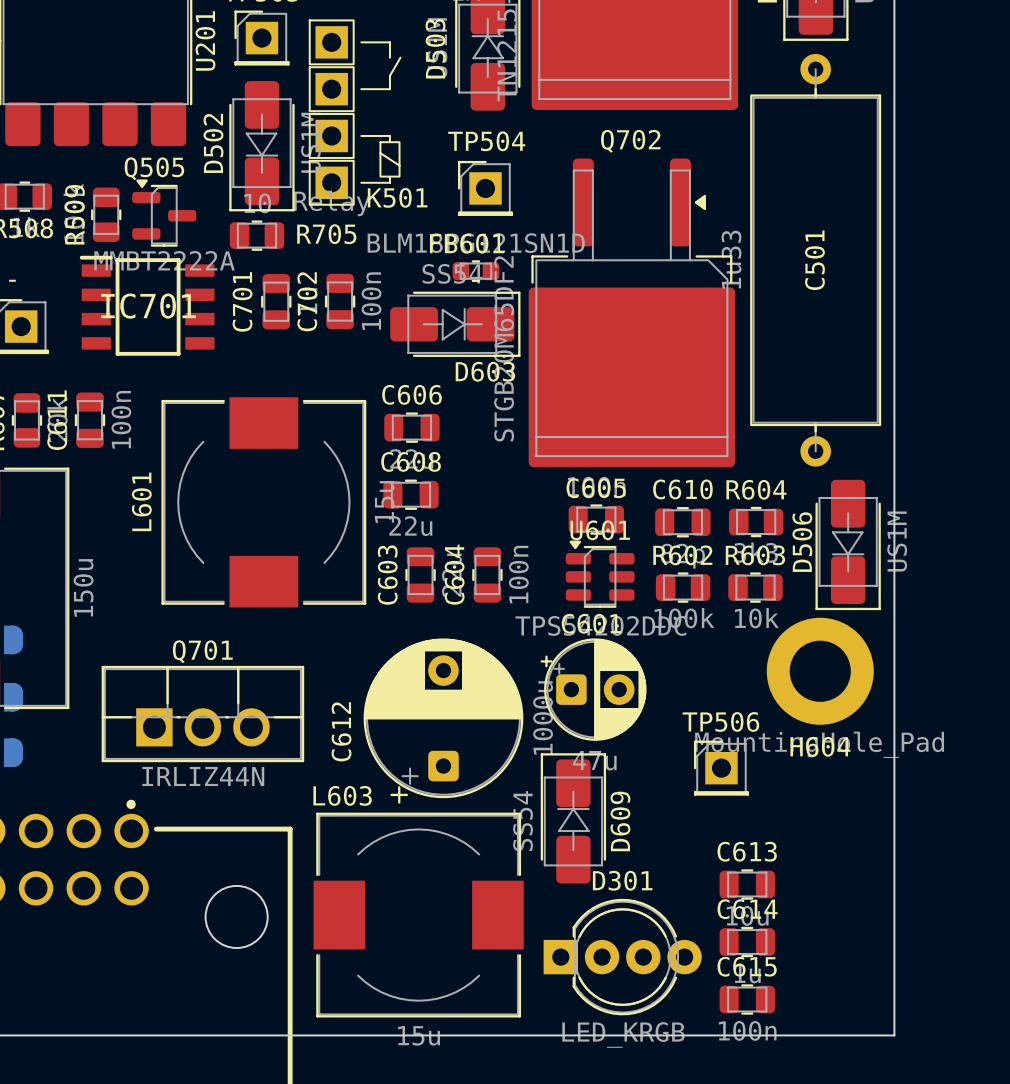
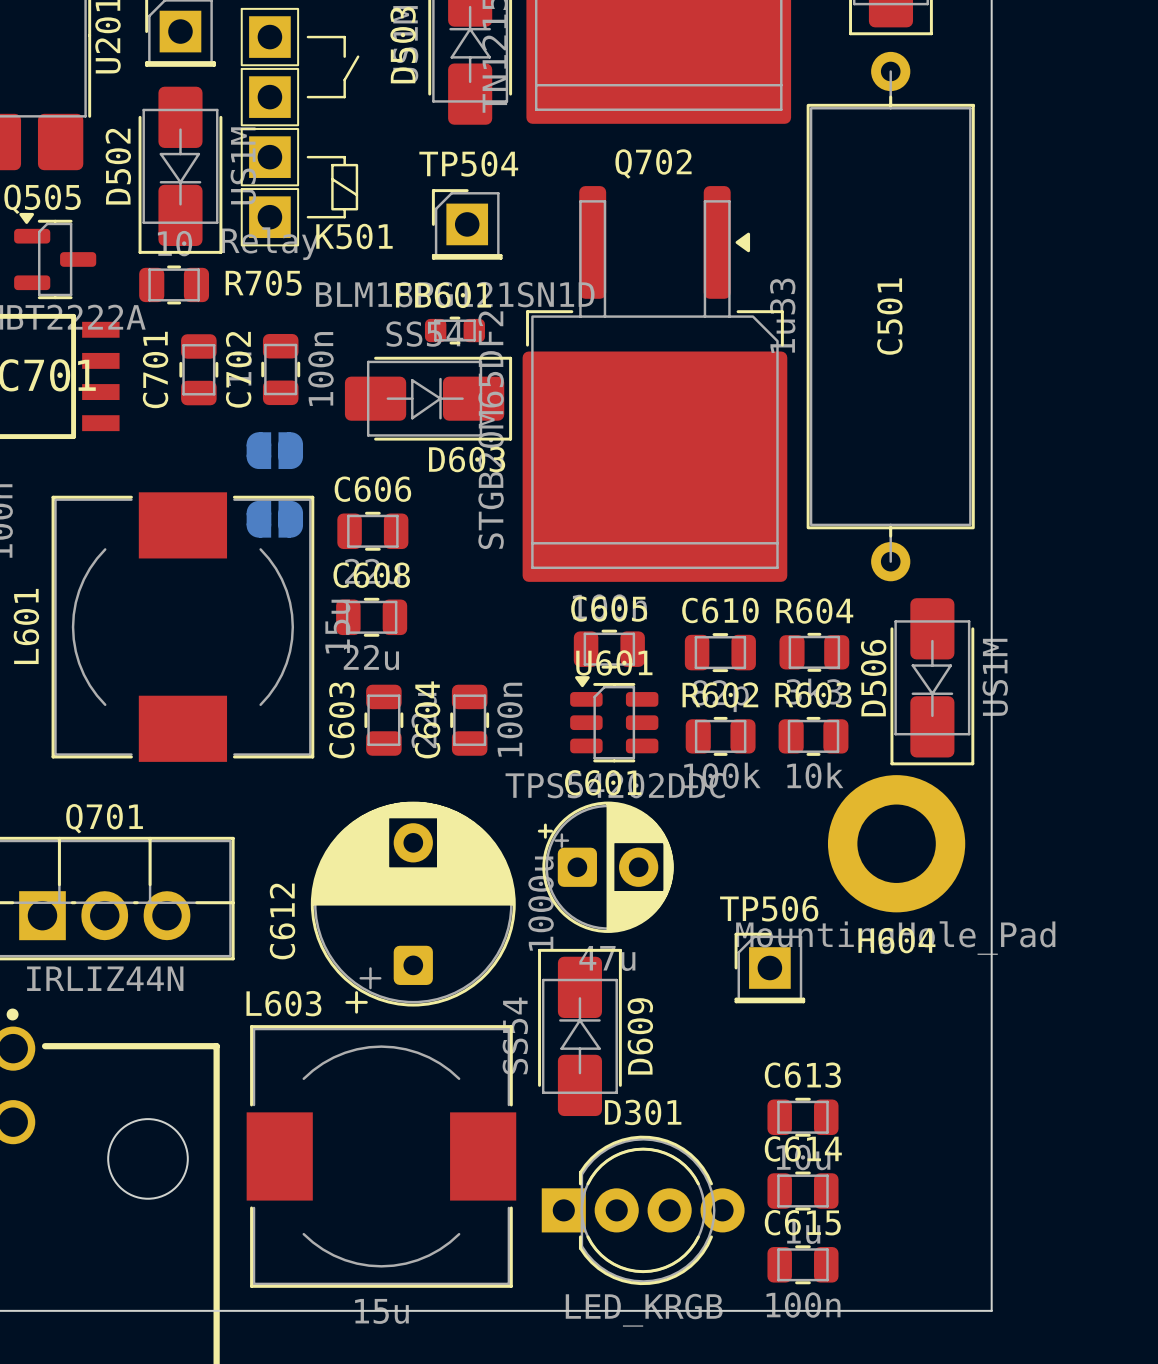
part: none -> (274, 450)
part: none -> (274, 519)

